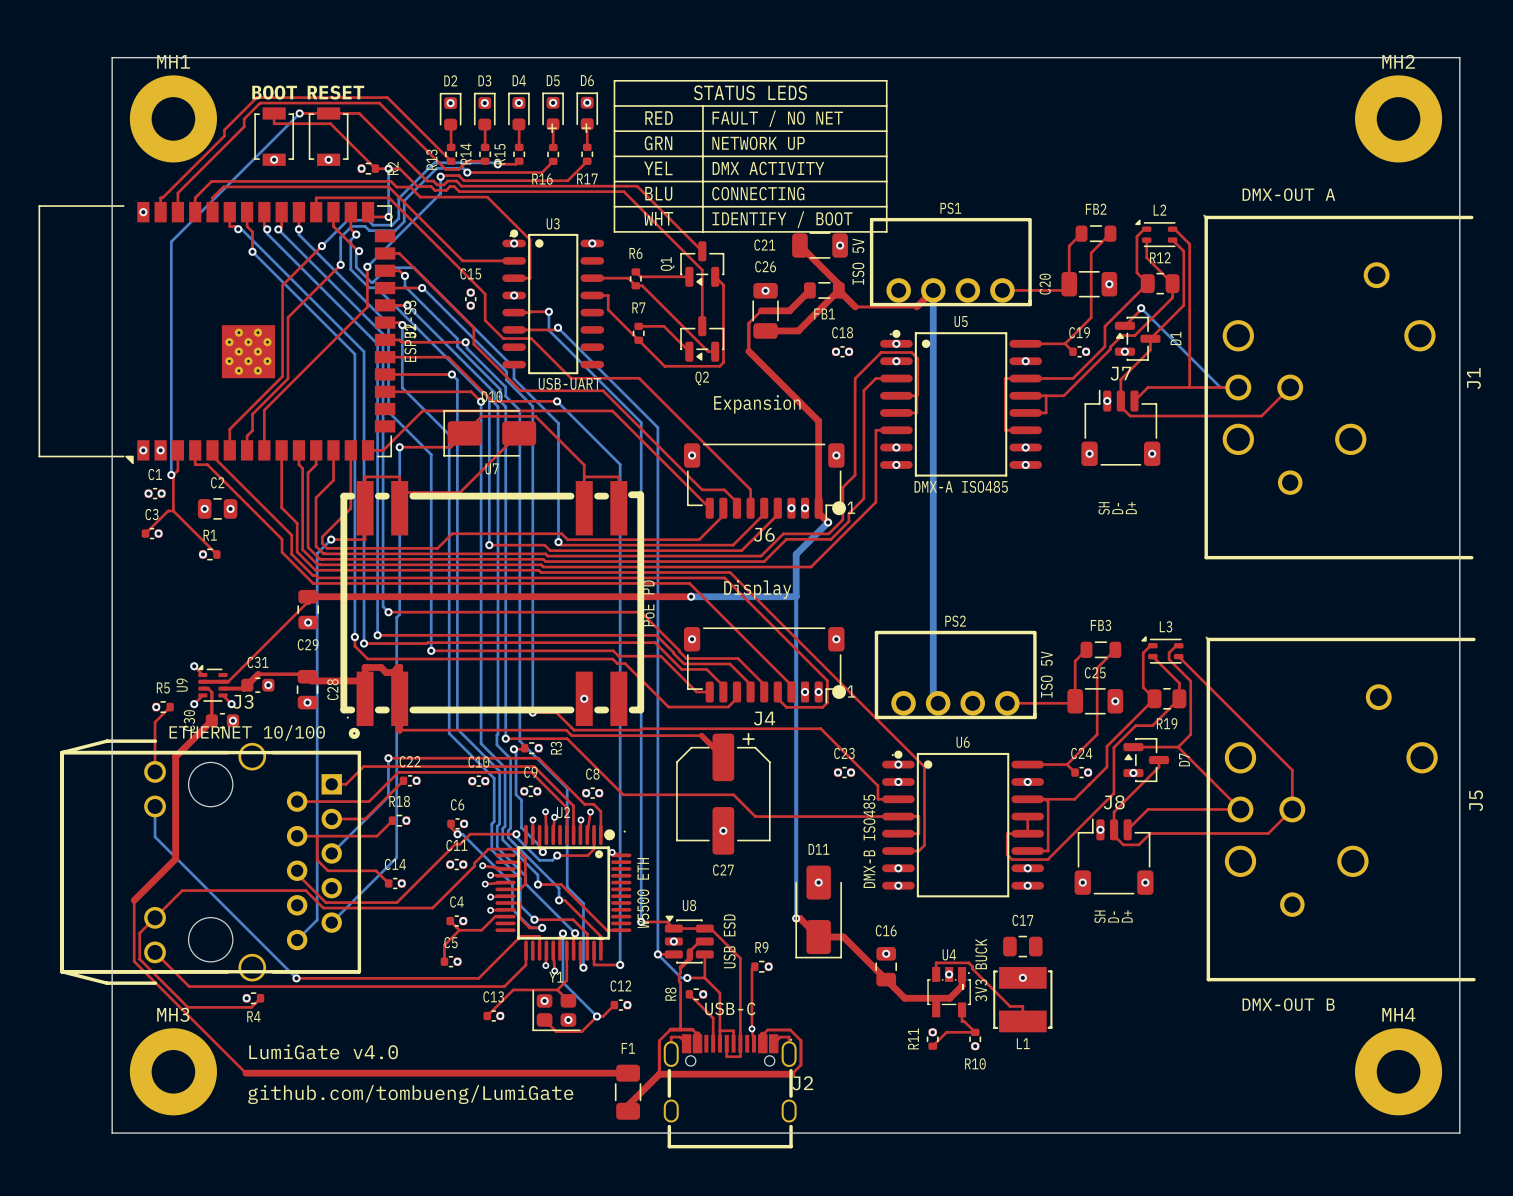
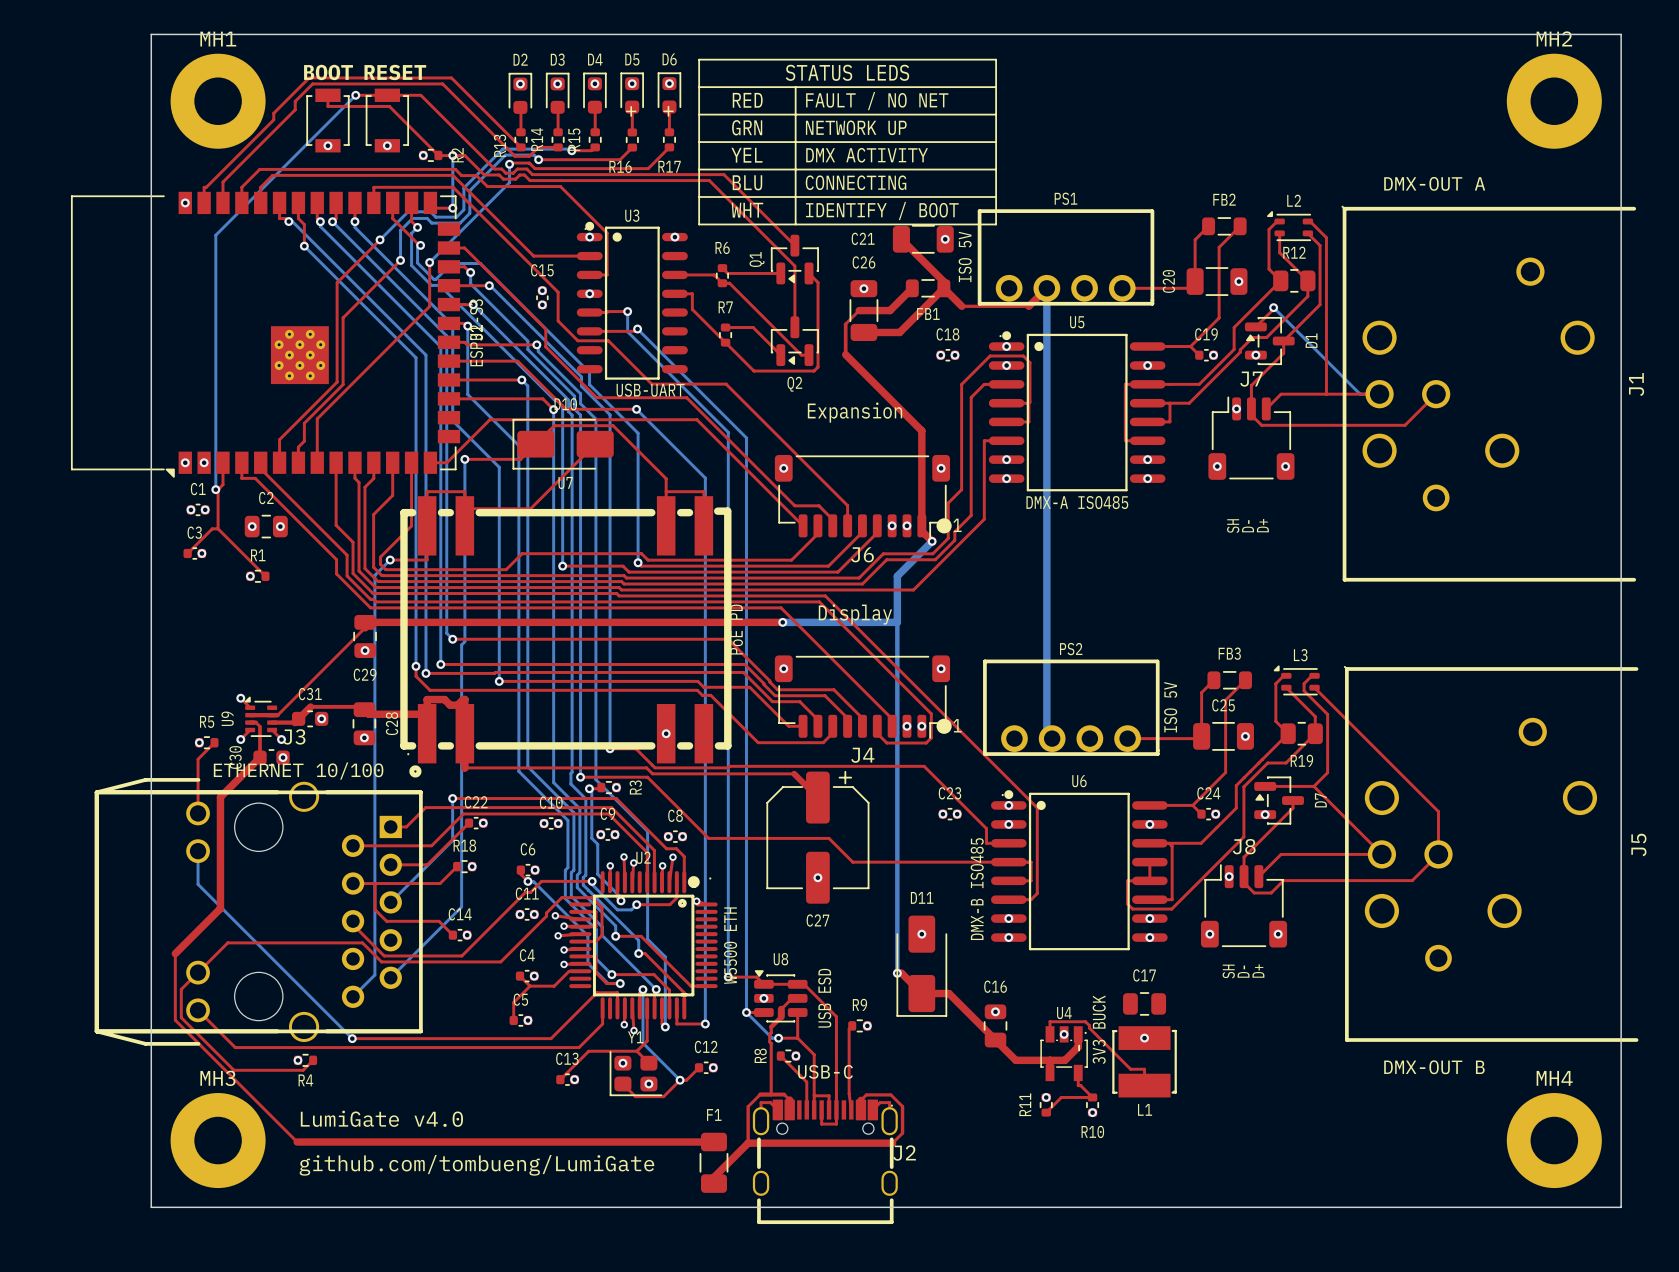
via: (752, 1028) -> none

